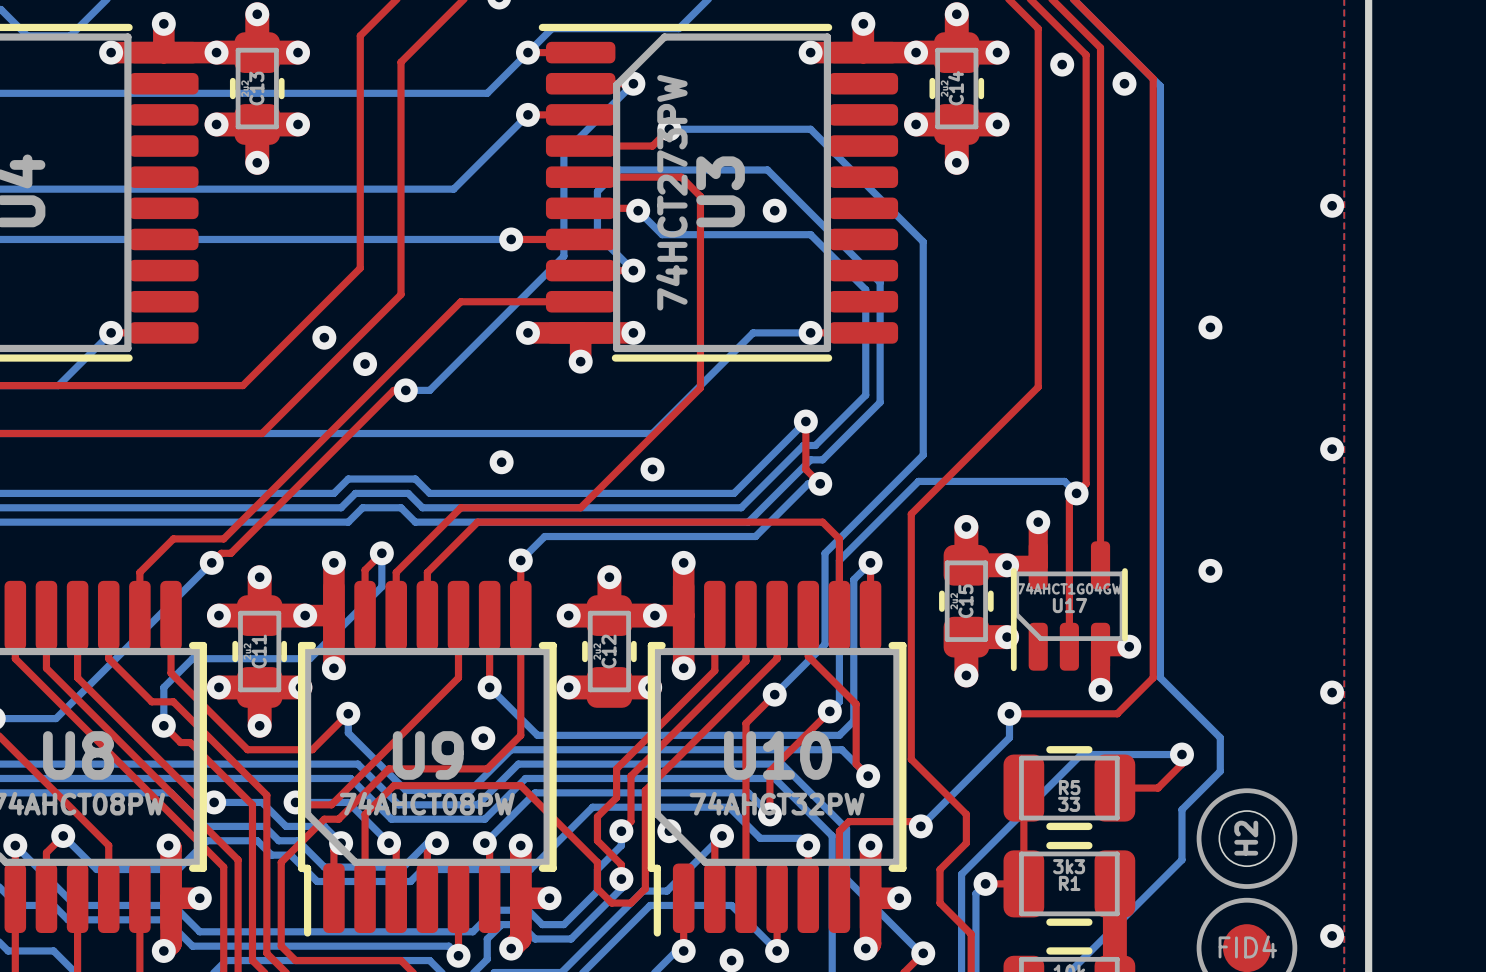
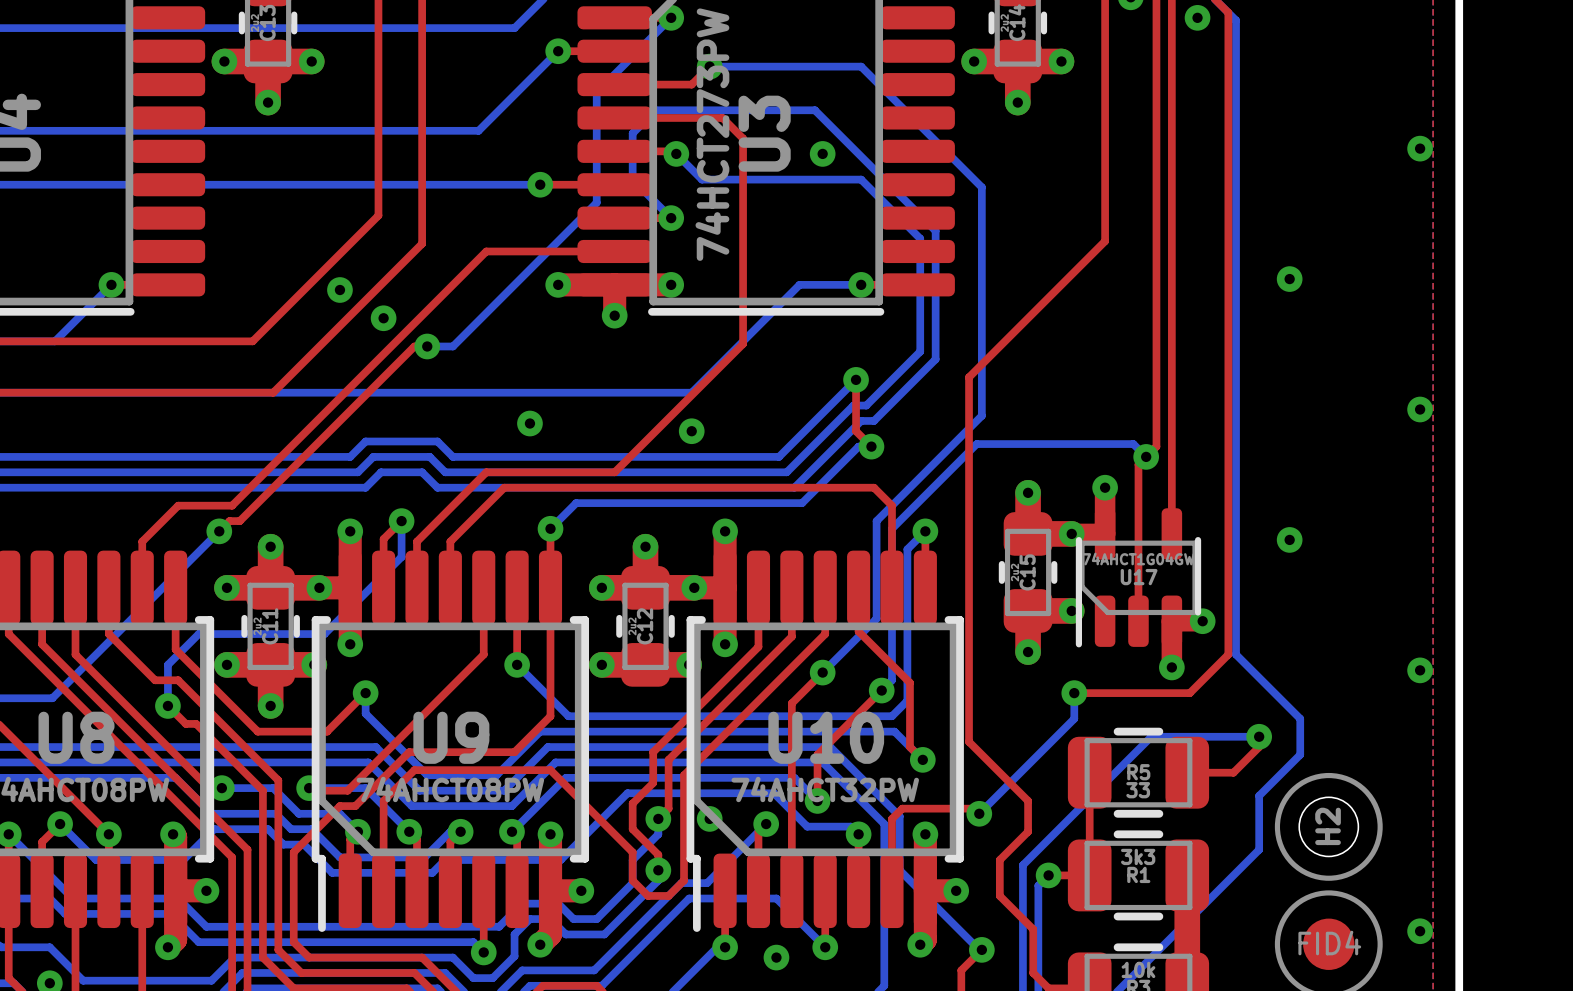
top track: (1038, 292) (1038, 387) (911, 514) -> (1105, 241) (969, 377) (969, 479)
via: (483, 738) -> none
via: none -> (108, 834)

